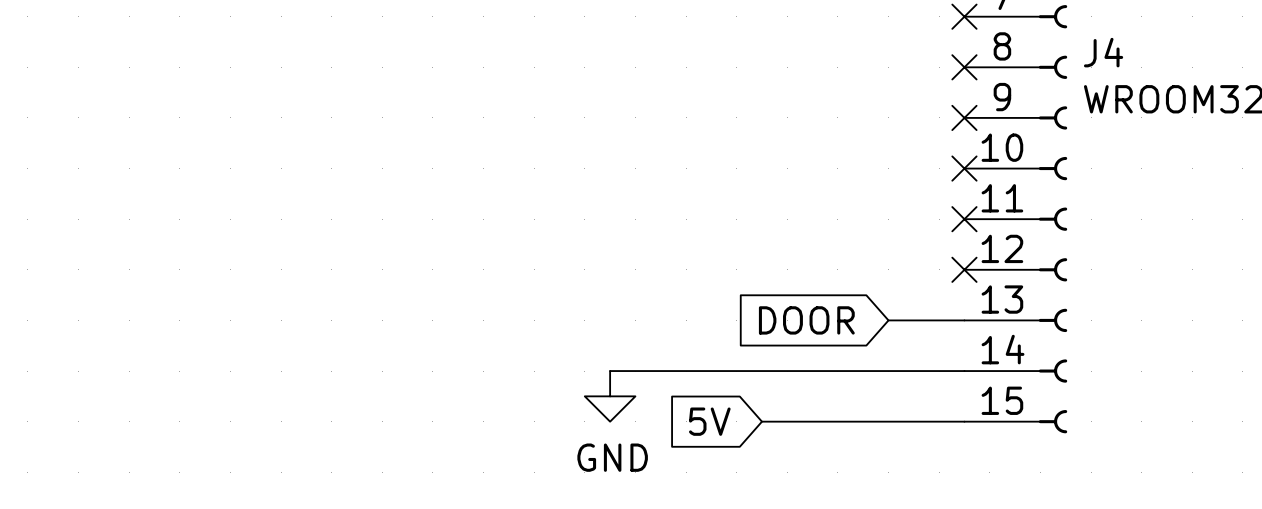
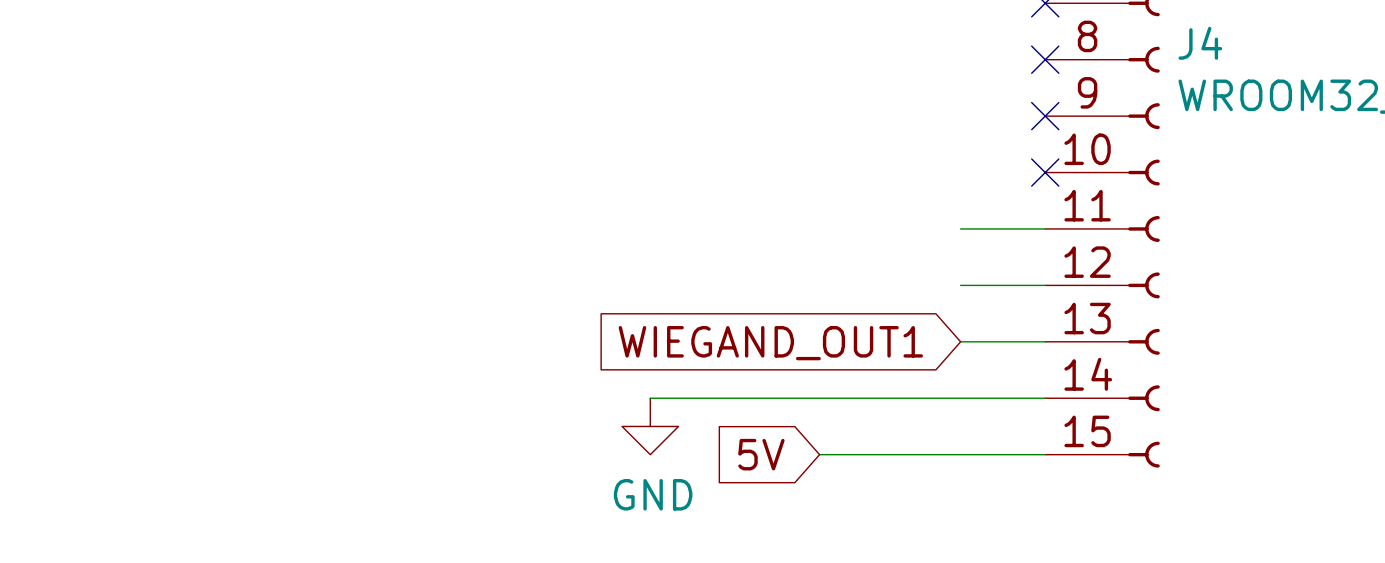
wire: none -> (960, 228) (1045, 228)
no-connect mark: (964, 219) -> none
wire: none -> (960, 285) (1045, 285)
no-connect mark: (964, 269) -> none
global label: DOOR (806, 320) -> WIEGAND_OUT1 (770, 343)

